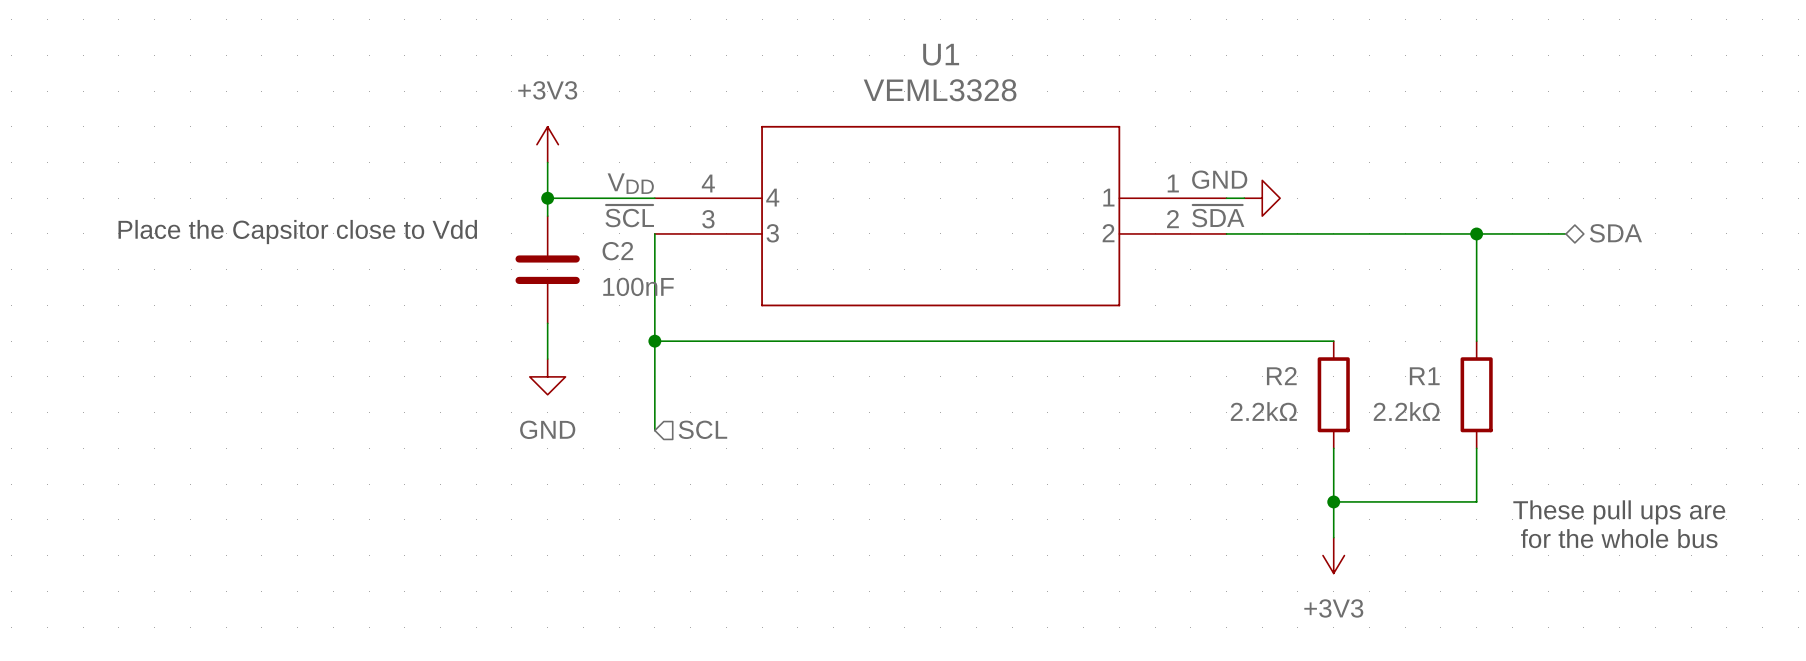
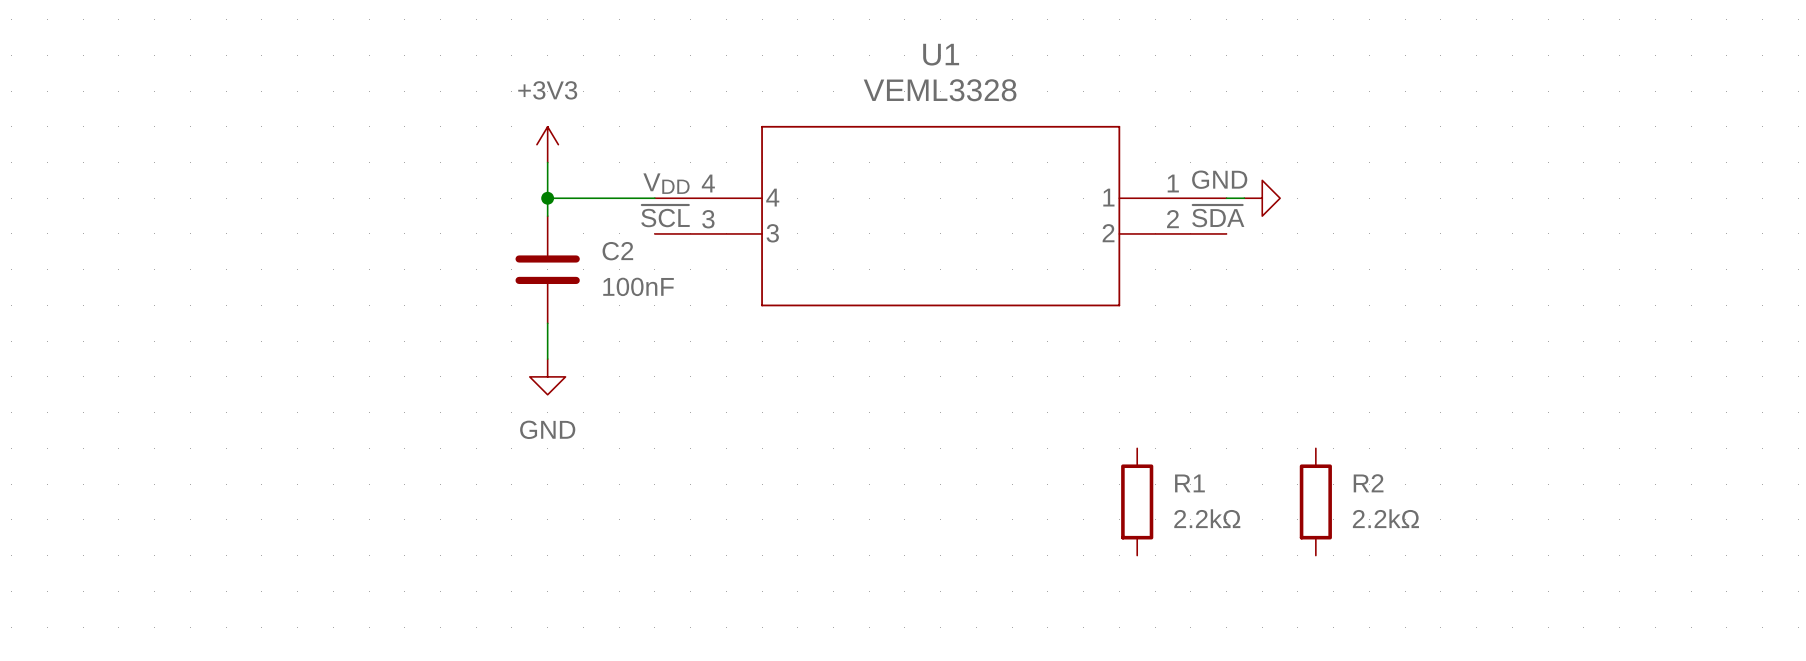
label position: VDD (630, 183) -> VDD (666, 183)
label position: ~{SCL} (629, 216) -> ~{SCL} (665, 216)
text: Place the Capsitor close to Vdd (297, 232) -> none
wire: (654, 233) (654, 430) -> none
wire: (1226, 233) (1565, 233) -> none
wire: (1476, 233) (1476, 341) -> none
junction: (1476, 233) -> none
hierarchical label: SDA (1615, 233) -> none
wire: (654, 341) (1333, 341) -> none
junction: (654, 341) -> none
R2 name position: R2 (1281, 376) -> R2 (1368, 483)
R1 name position: R1 (1424, 376) -> R1 (1189, 483)
R2 position: (1333, 394) -> (1315, 501)
R1 position: (1476, 394) -> (1137, 501)
R2 value position: 2.2kΩ (1263, 411) -> 2.2kΩ (1385, 518)
R1 value position: 2.2kΩ (1406, 411) -> 2.2kΩ (1207, 518)
hierarchical label: SCL (702, 429) -> none
wire: (1333, 448) (1333, 537) -> none
wire: (1476, 448) (1476, 501) (1333, 501) -> none
junction: (1333, 501) -> none
text: These pull ups are (1619, 512) -> none
text: for the whole bus (1619, 538) -> none
power symbol: +3V3 (1333, 555) -> none

